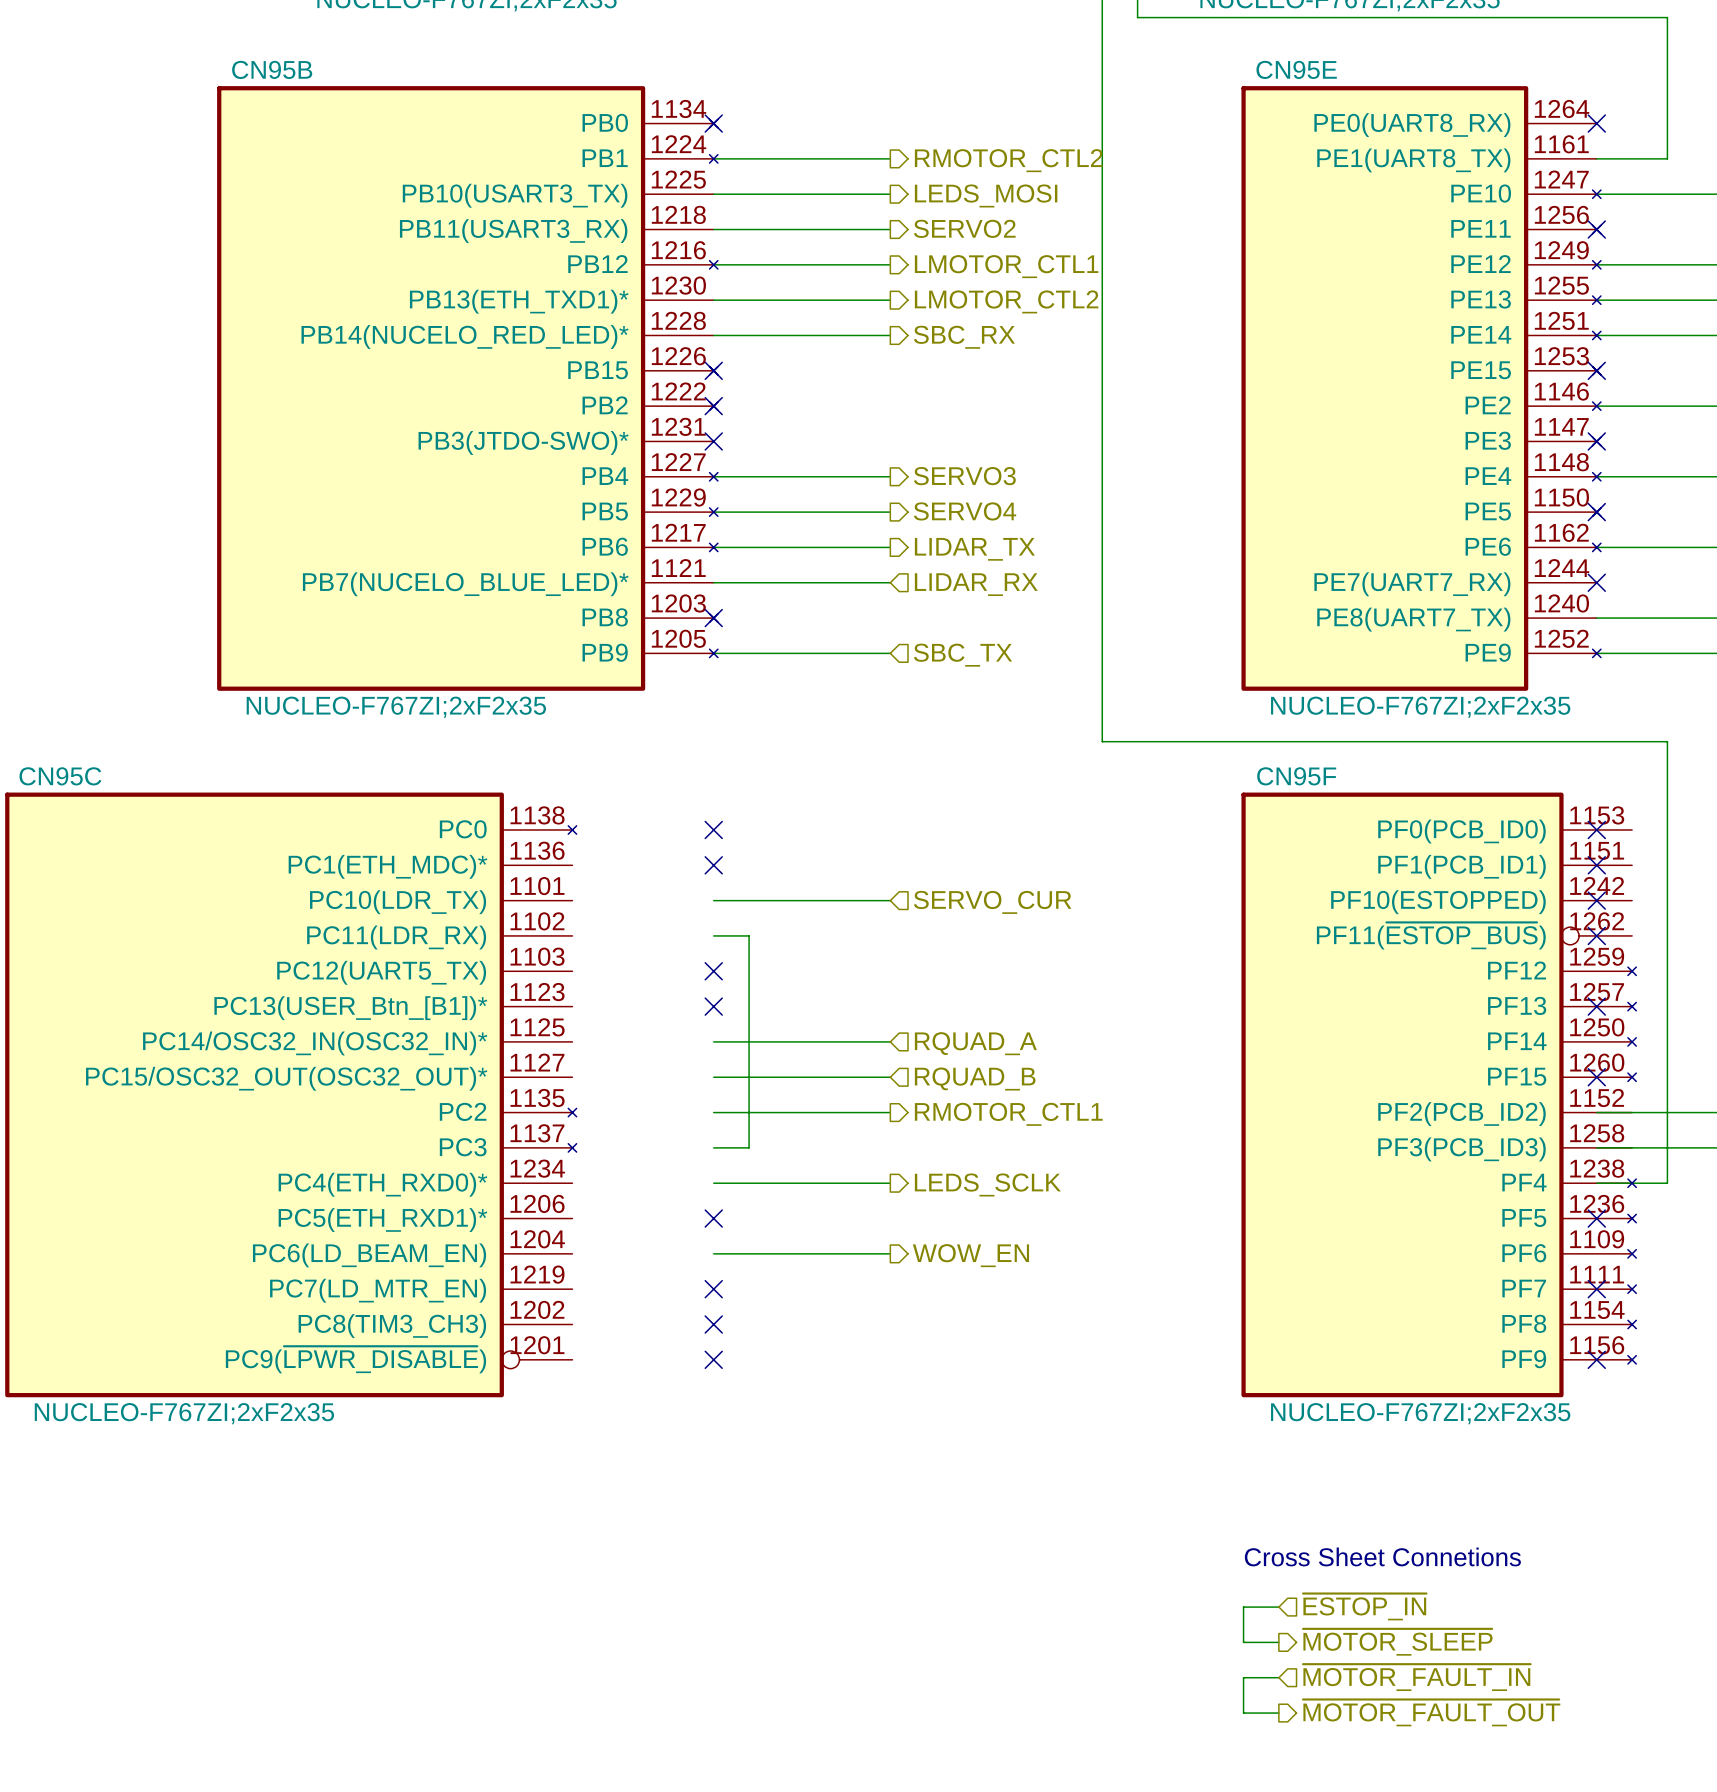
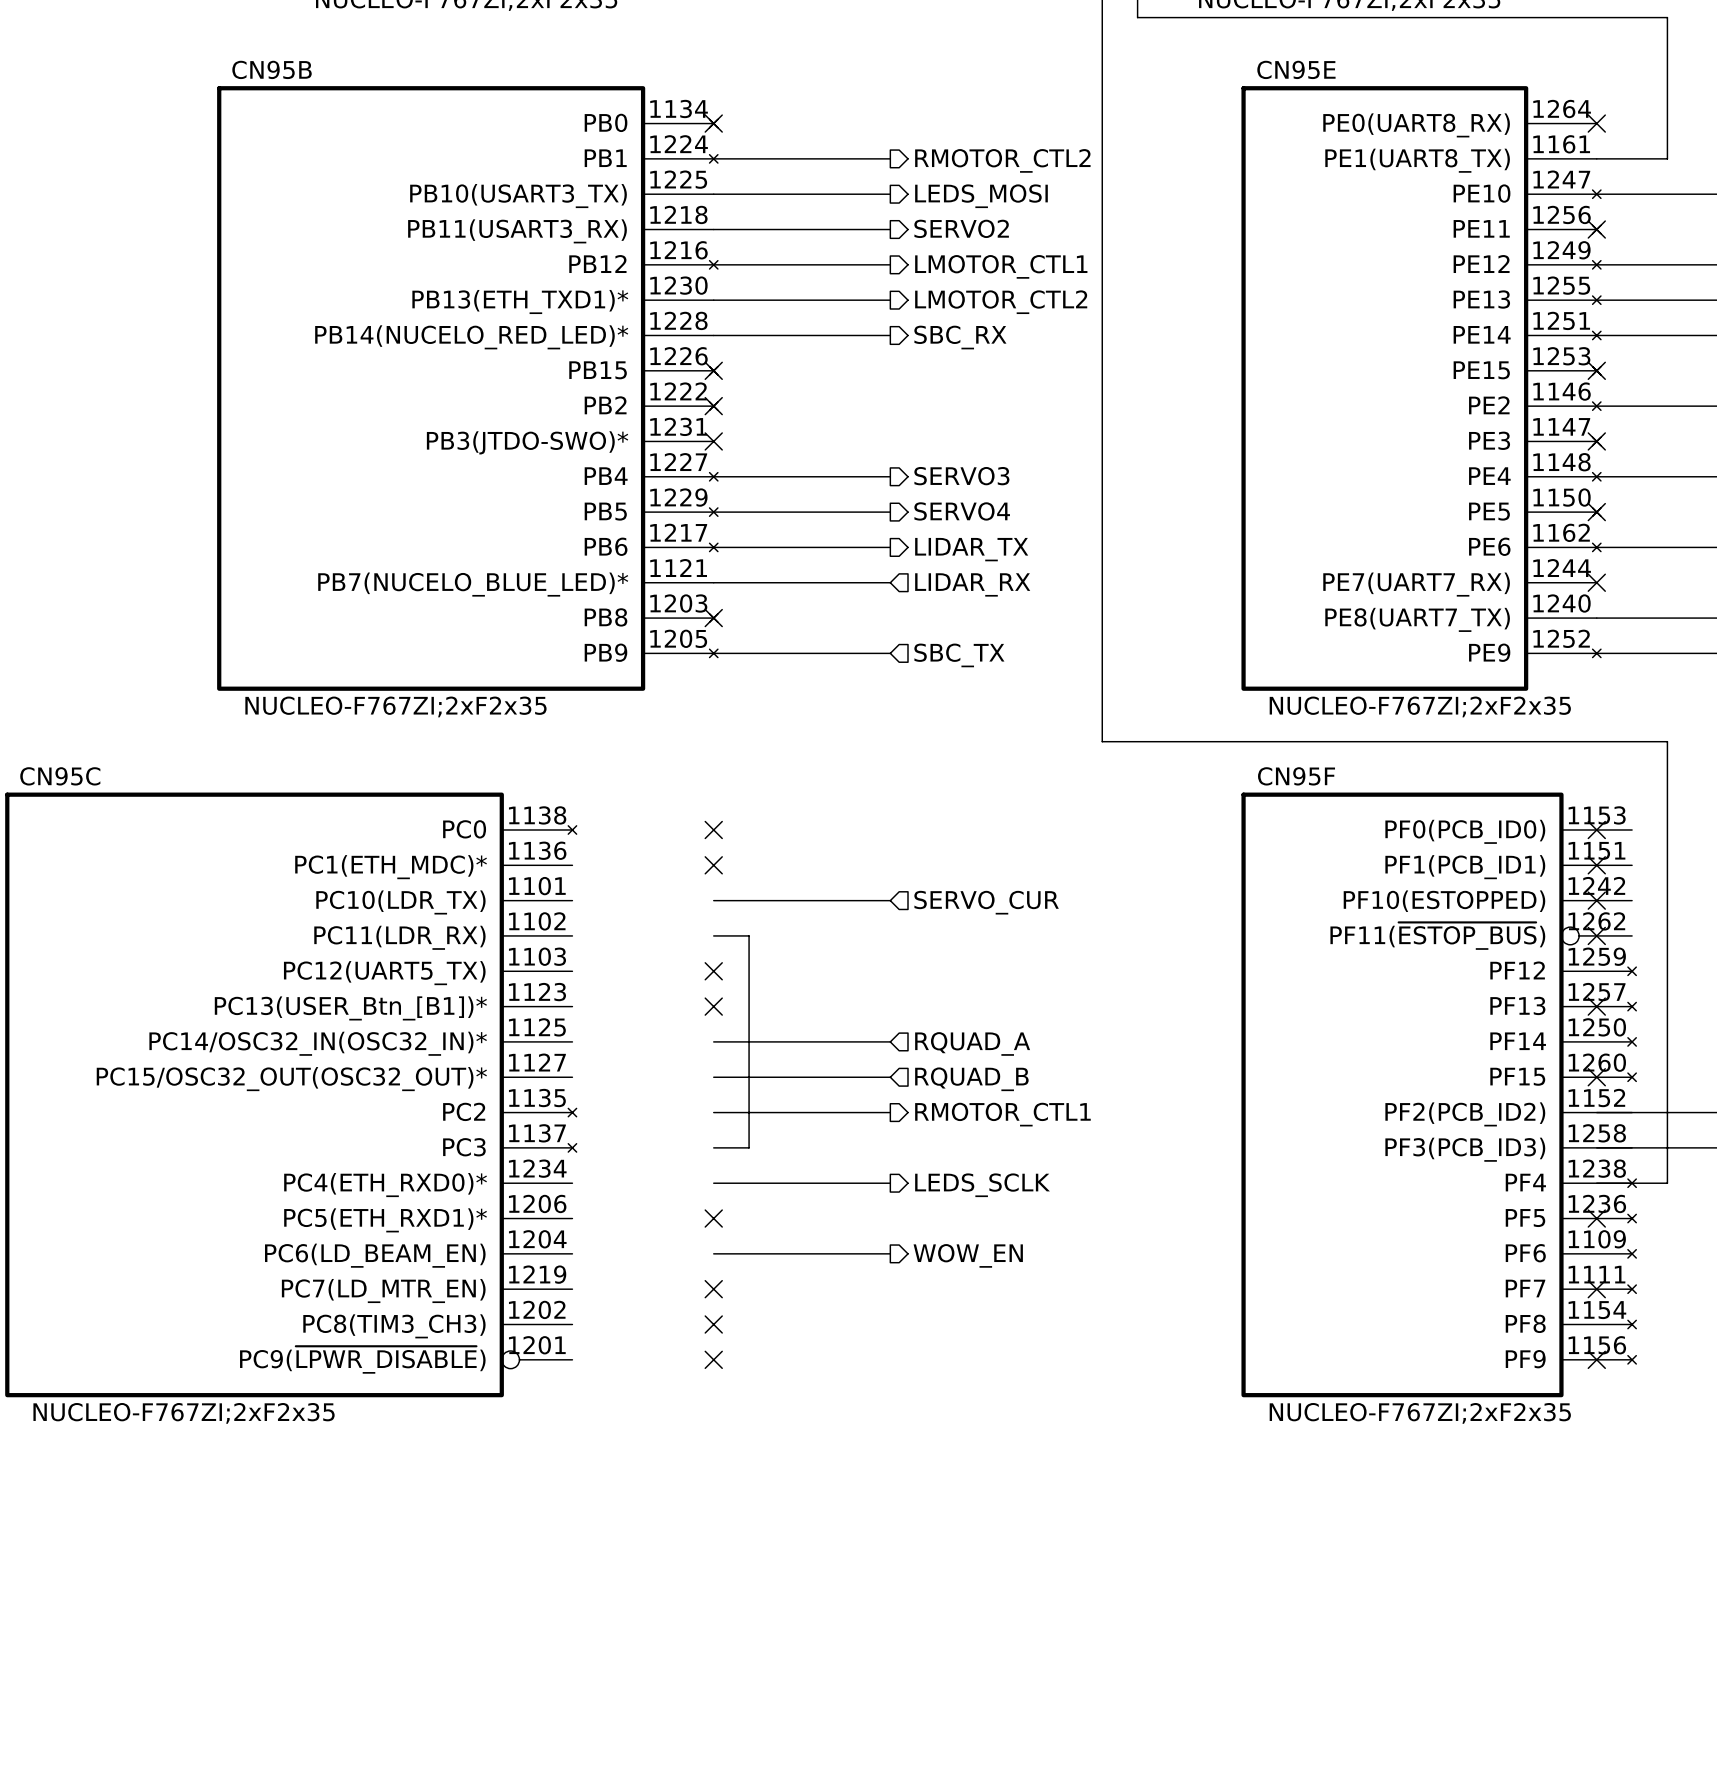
text: Cross Sheet Connetions (1382, 1556) -> none
hierarchical label: ~{ESTOP_IN} (1364, 1606) -> none
wire: (1278, 1607) (1243, 1607) (1243, 1642) (1278, 1642) -> none
hierarchical label: ~{MOTOR_SLEEP} (1397, 1642) -> none
wire: (1278, 1677) (1243, 1677) (1243, 1713) (1278, 1713) -> none
hierarchical label: ~{MOTOR_FAULT_IN} (1416, 1677) -> none
hierarchical label: ~{MOTOR_FAULT_OUT} (1431, 1712) -> none

